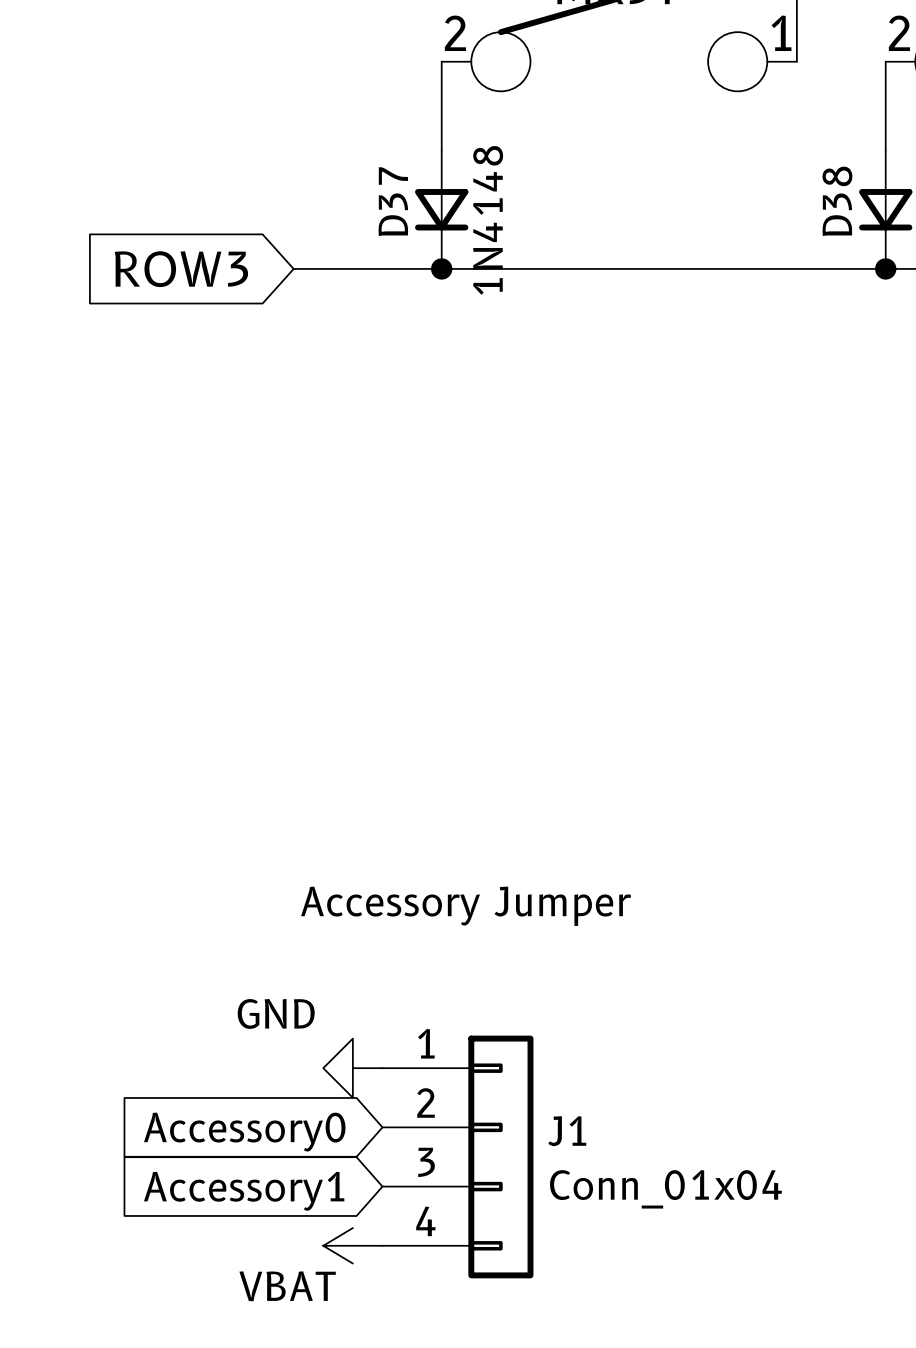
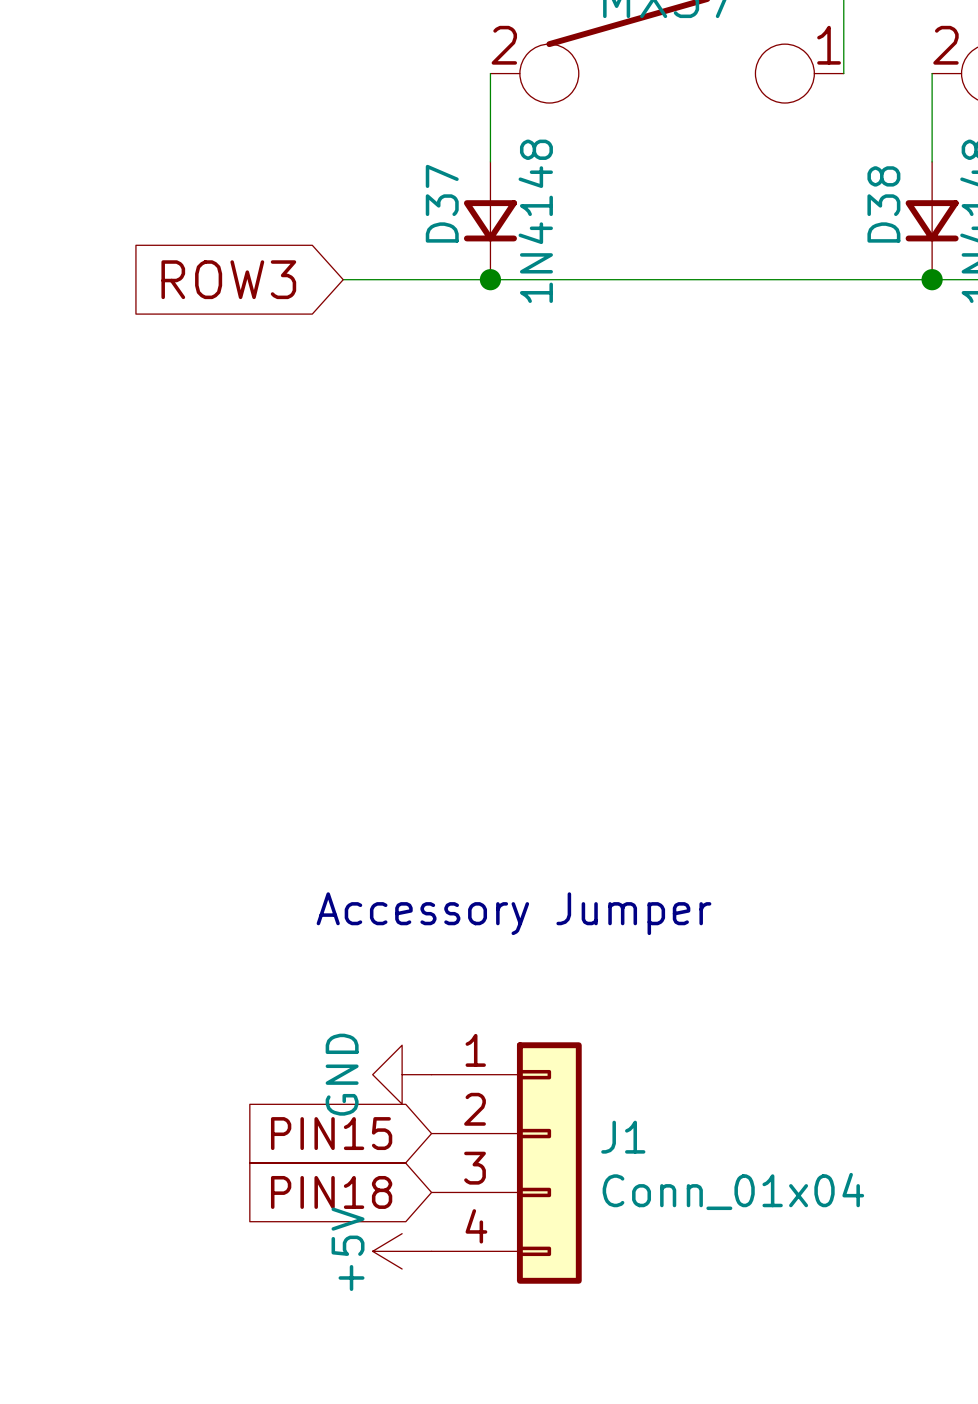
power symbol text rotation: 0° (276, 1013) -> 90° counterclockwise (342, 1074)
global label: Accessory0 (244, 1132) -> PIN15 (331, 1133)
global label: Accessory1 (244, 1191) -> PIN18 (331, 1192)
power symbol: VBAT (352, 1245) -> +5V (402, 1251)

